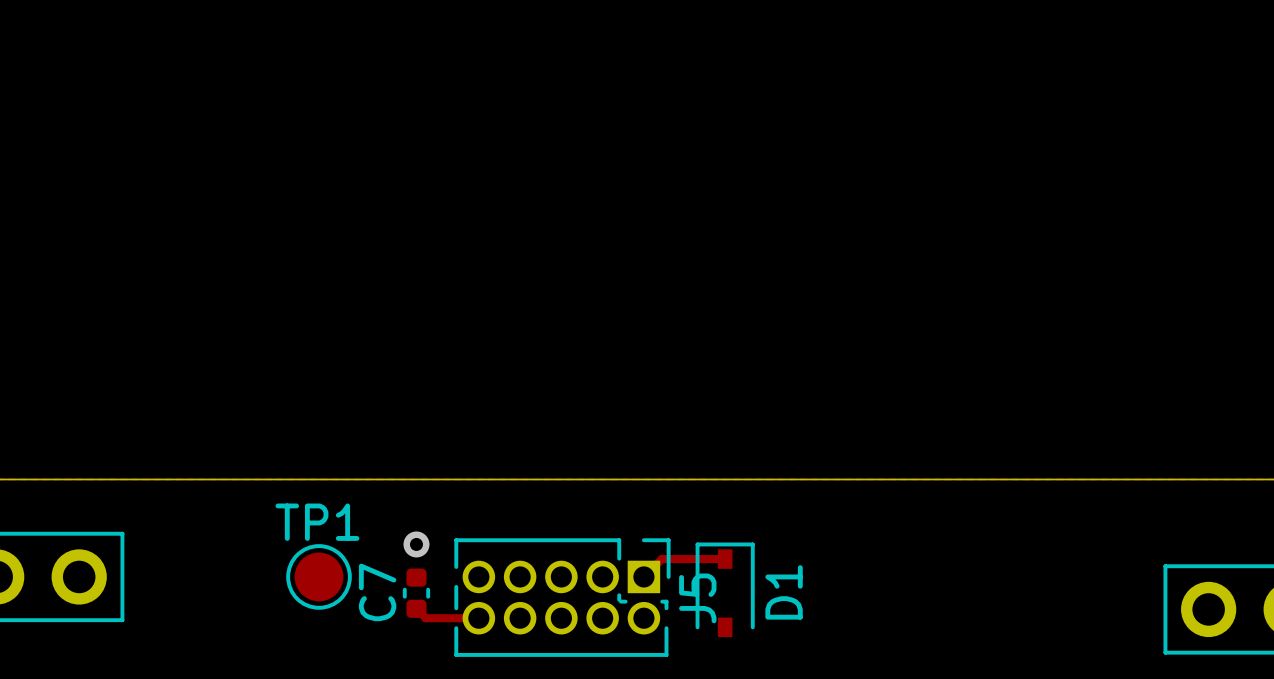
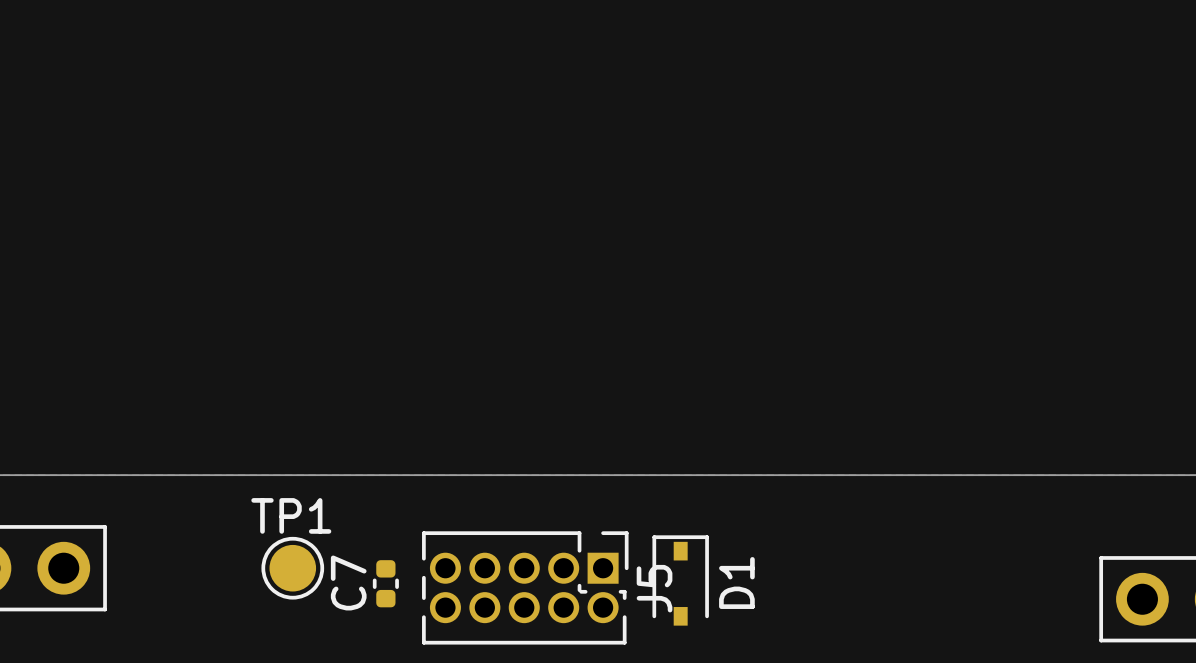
via: (416, 544) -> none
track: (725, 559) (661, 559) (643, 576) -> none
track: (416, 608) (425, 618) (478, 618) -> none

